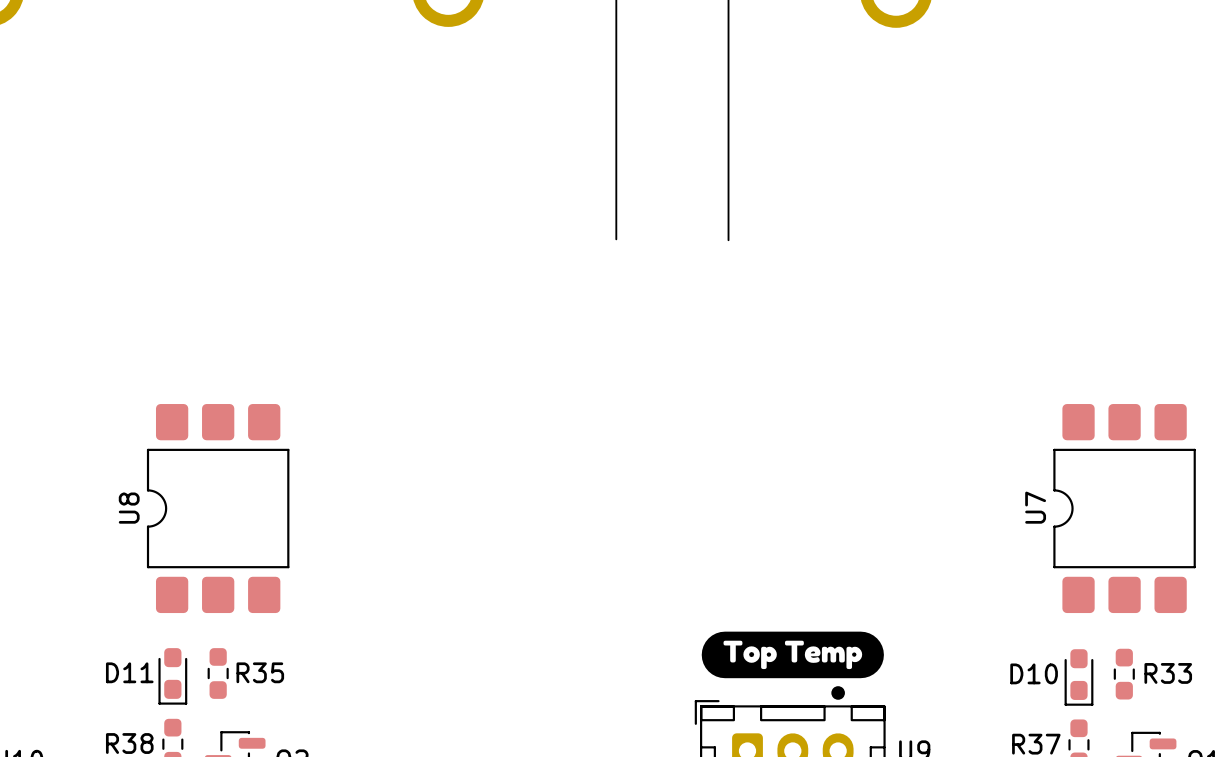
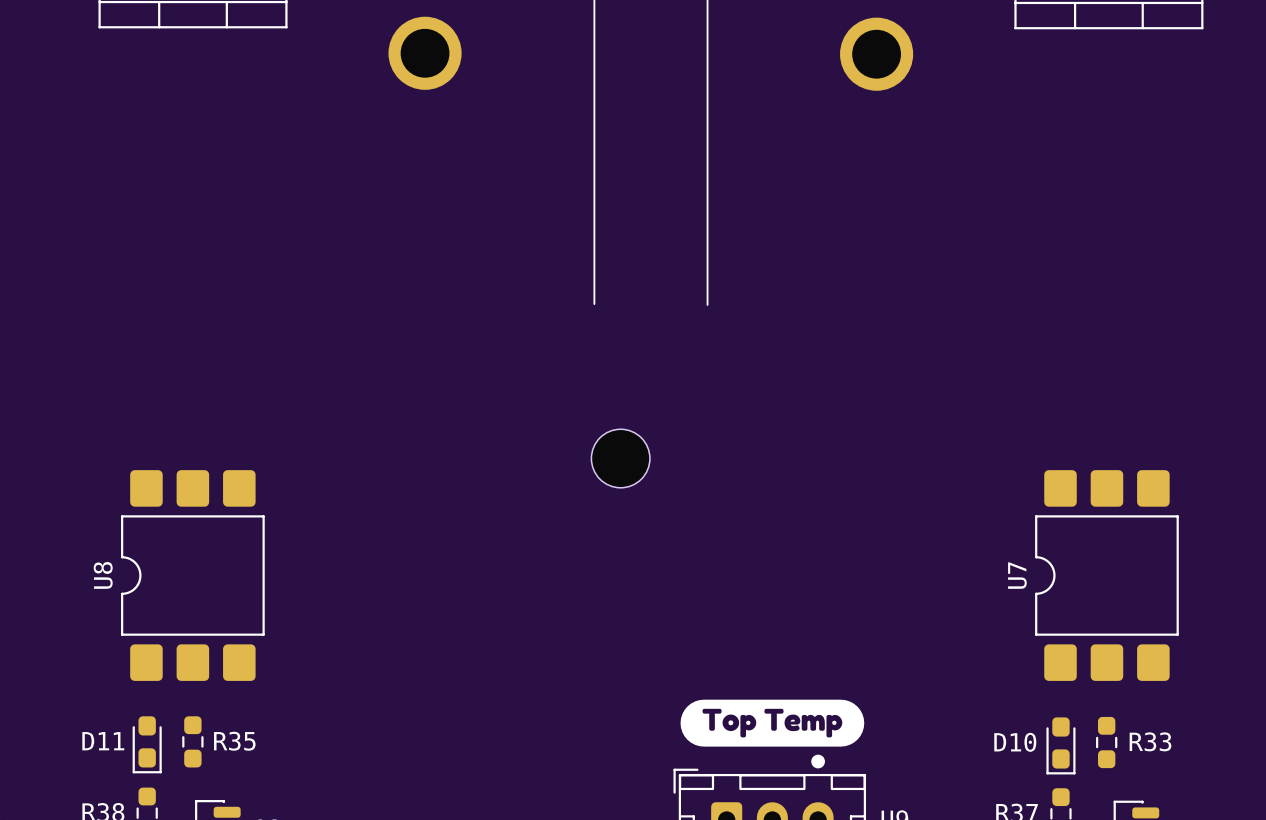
part: none -> (620, 458)

